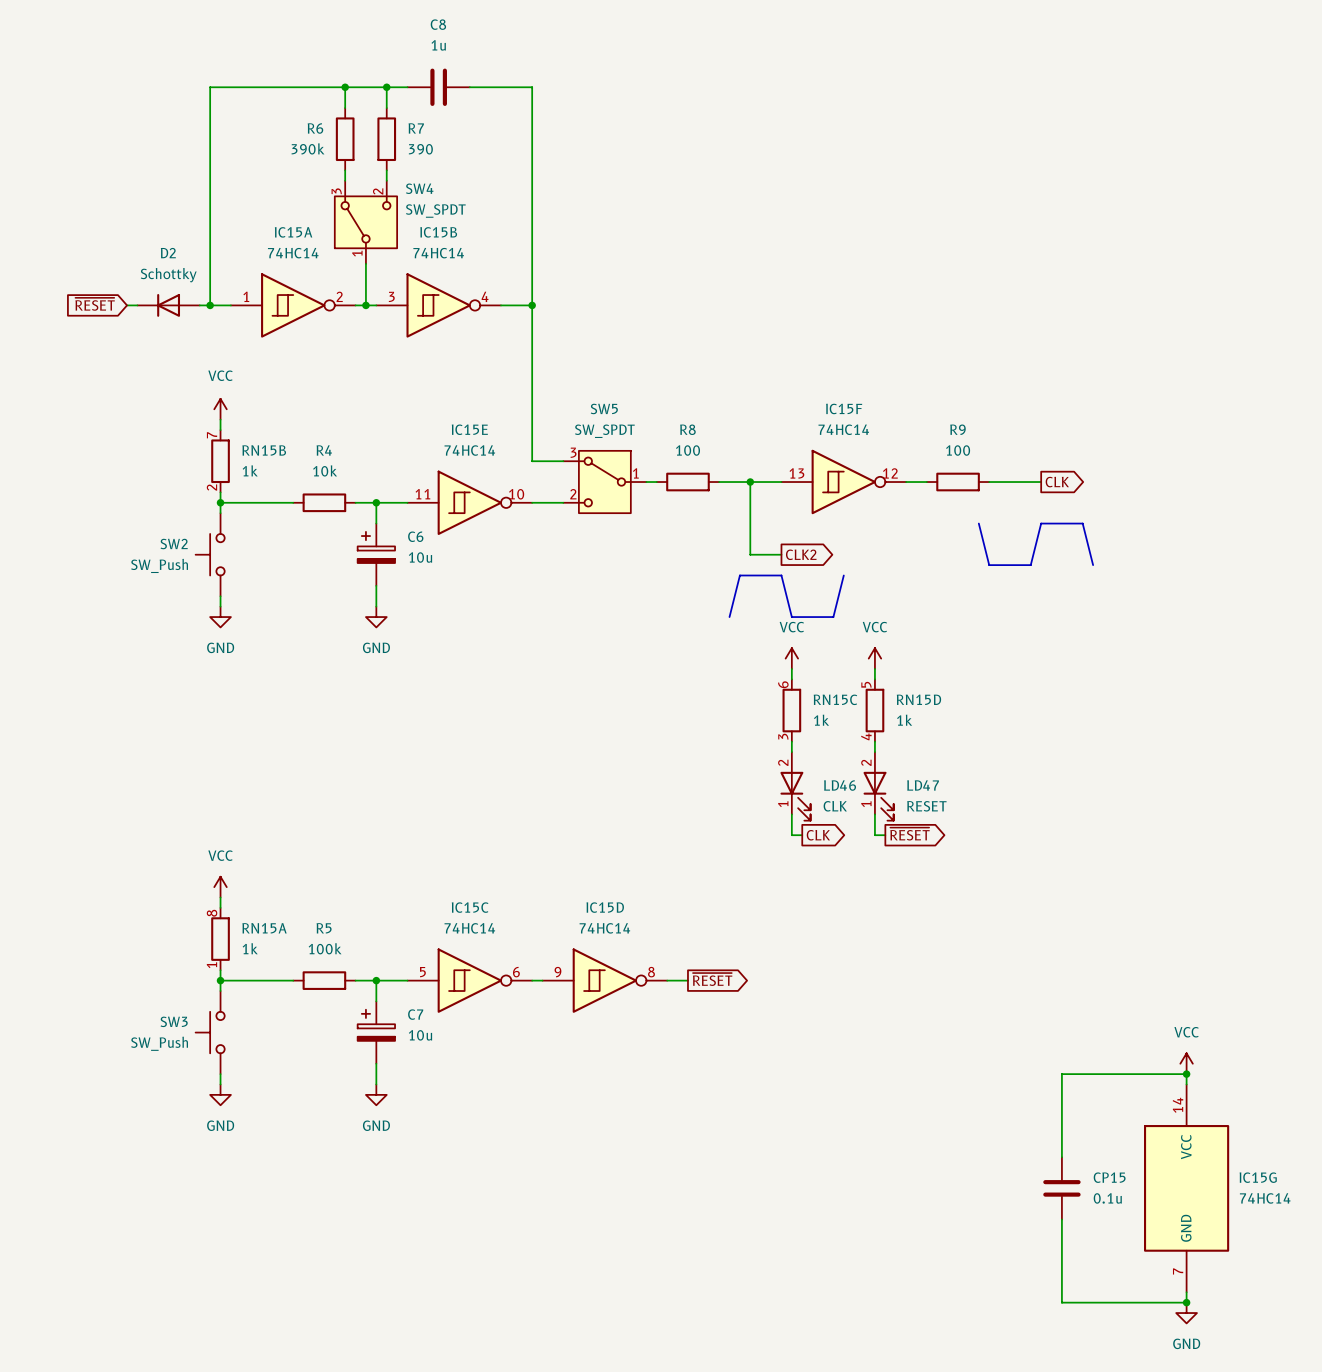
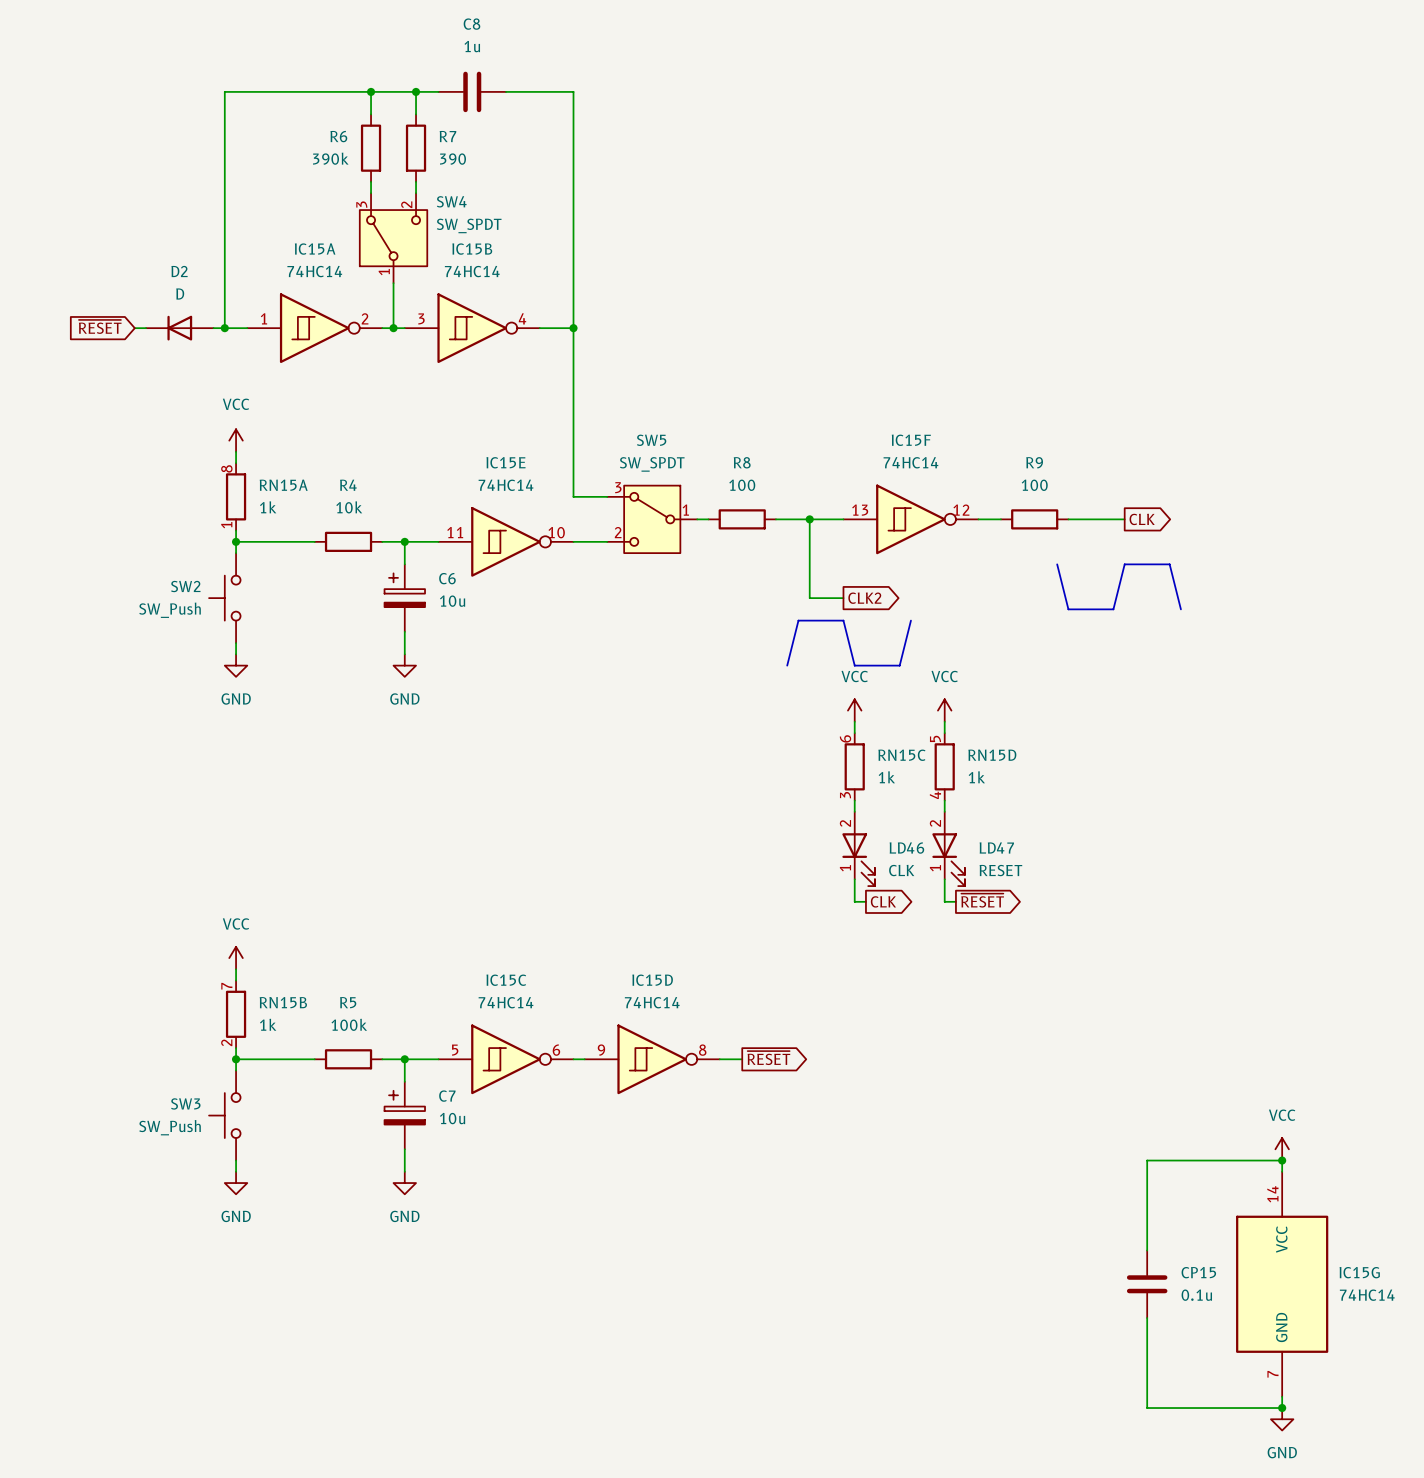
D2 value: Schottky (168, 275) -> D (180, 294)
RN15B position: (220, 461) -> (236, 1014)
RN15A position: (220, 939) -> (236, 496)

